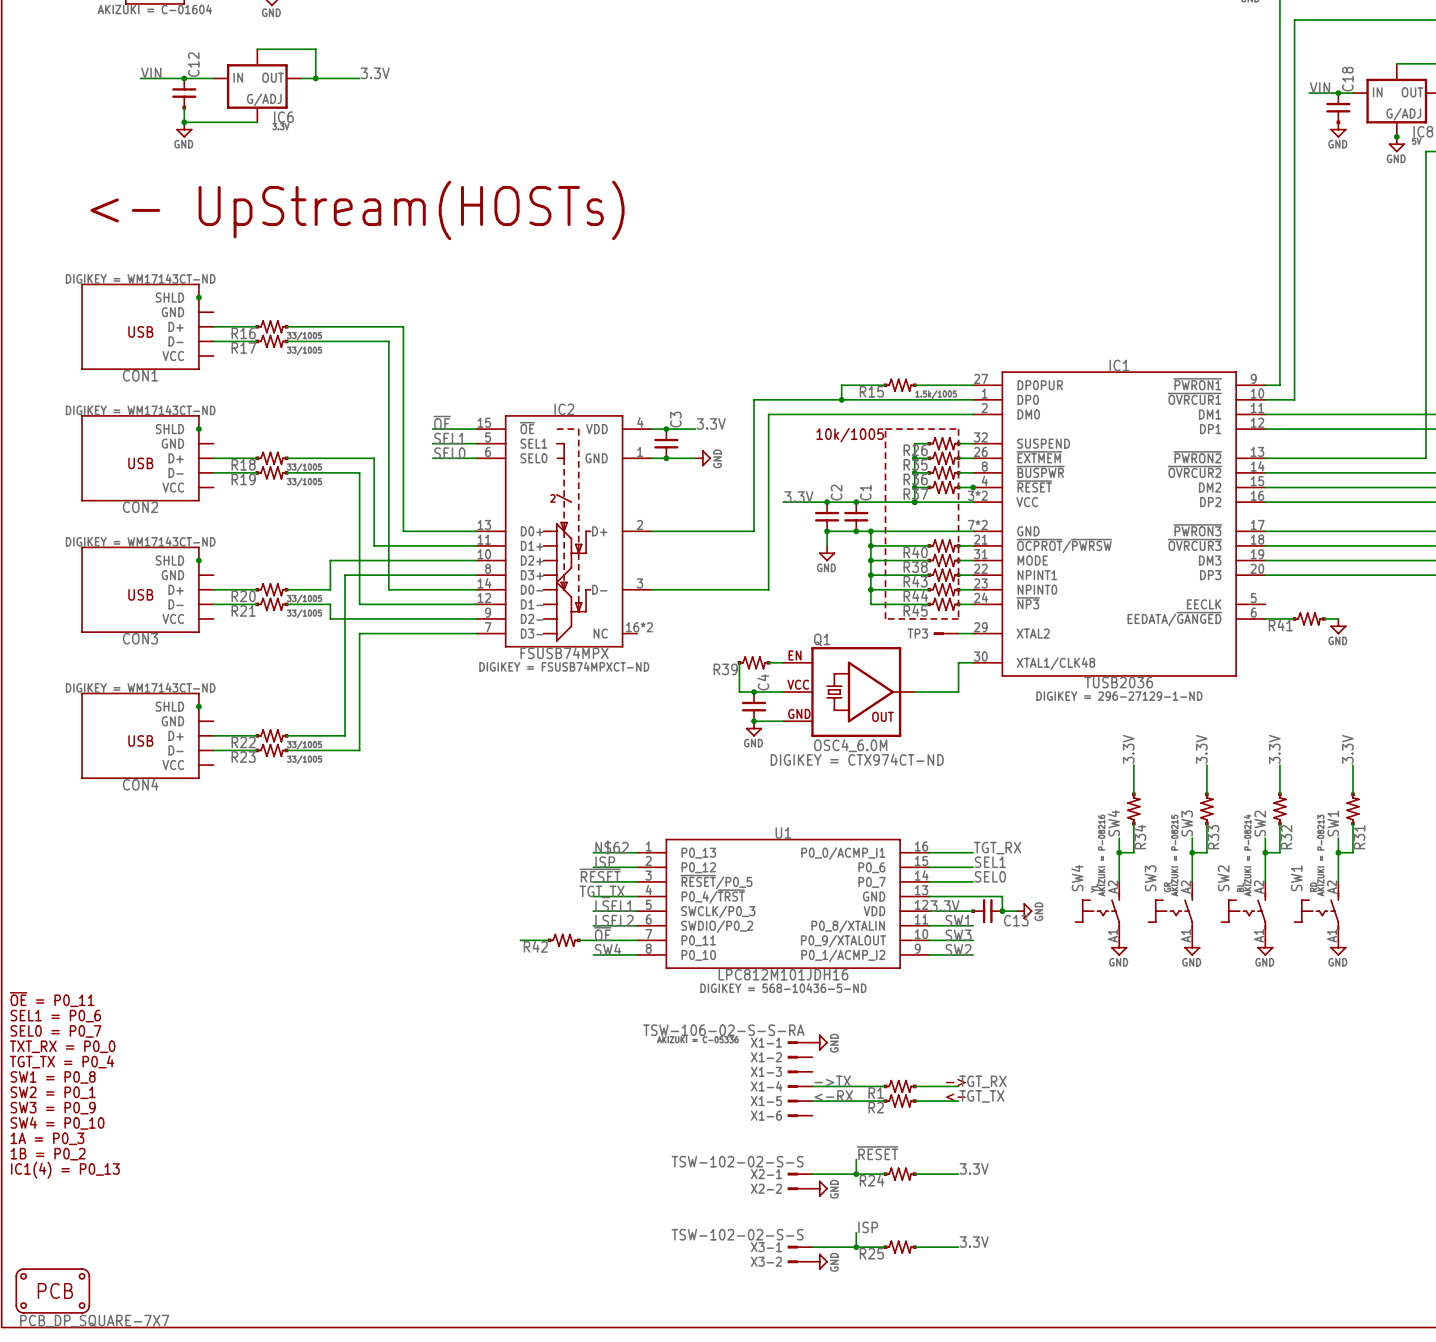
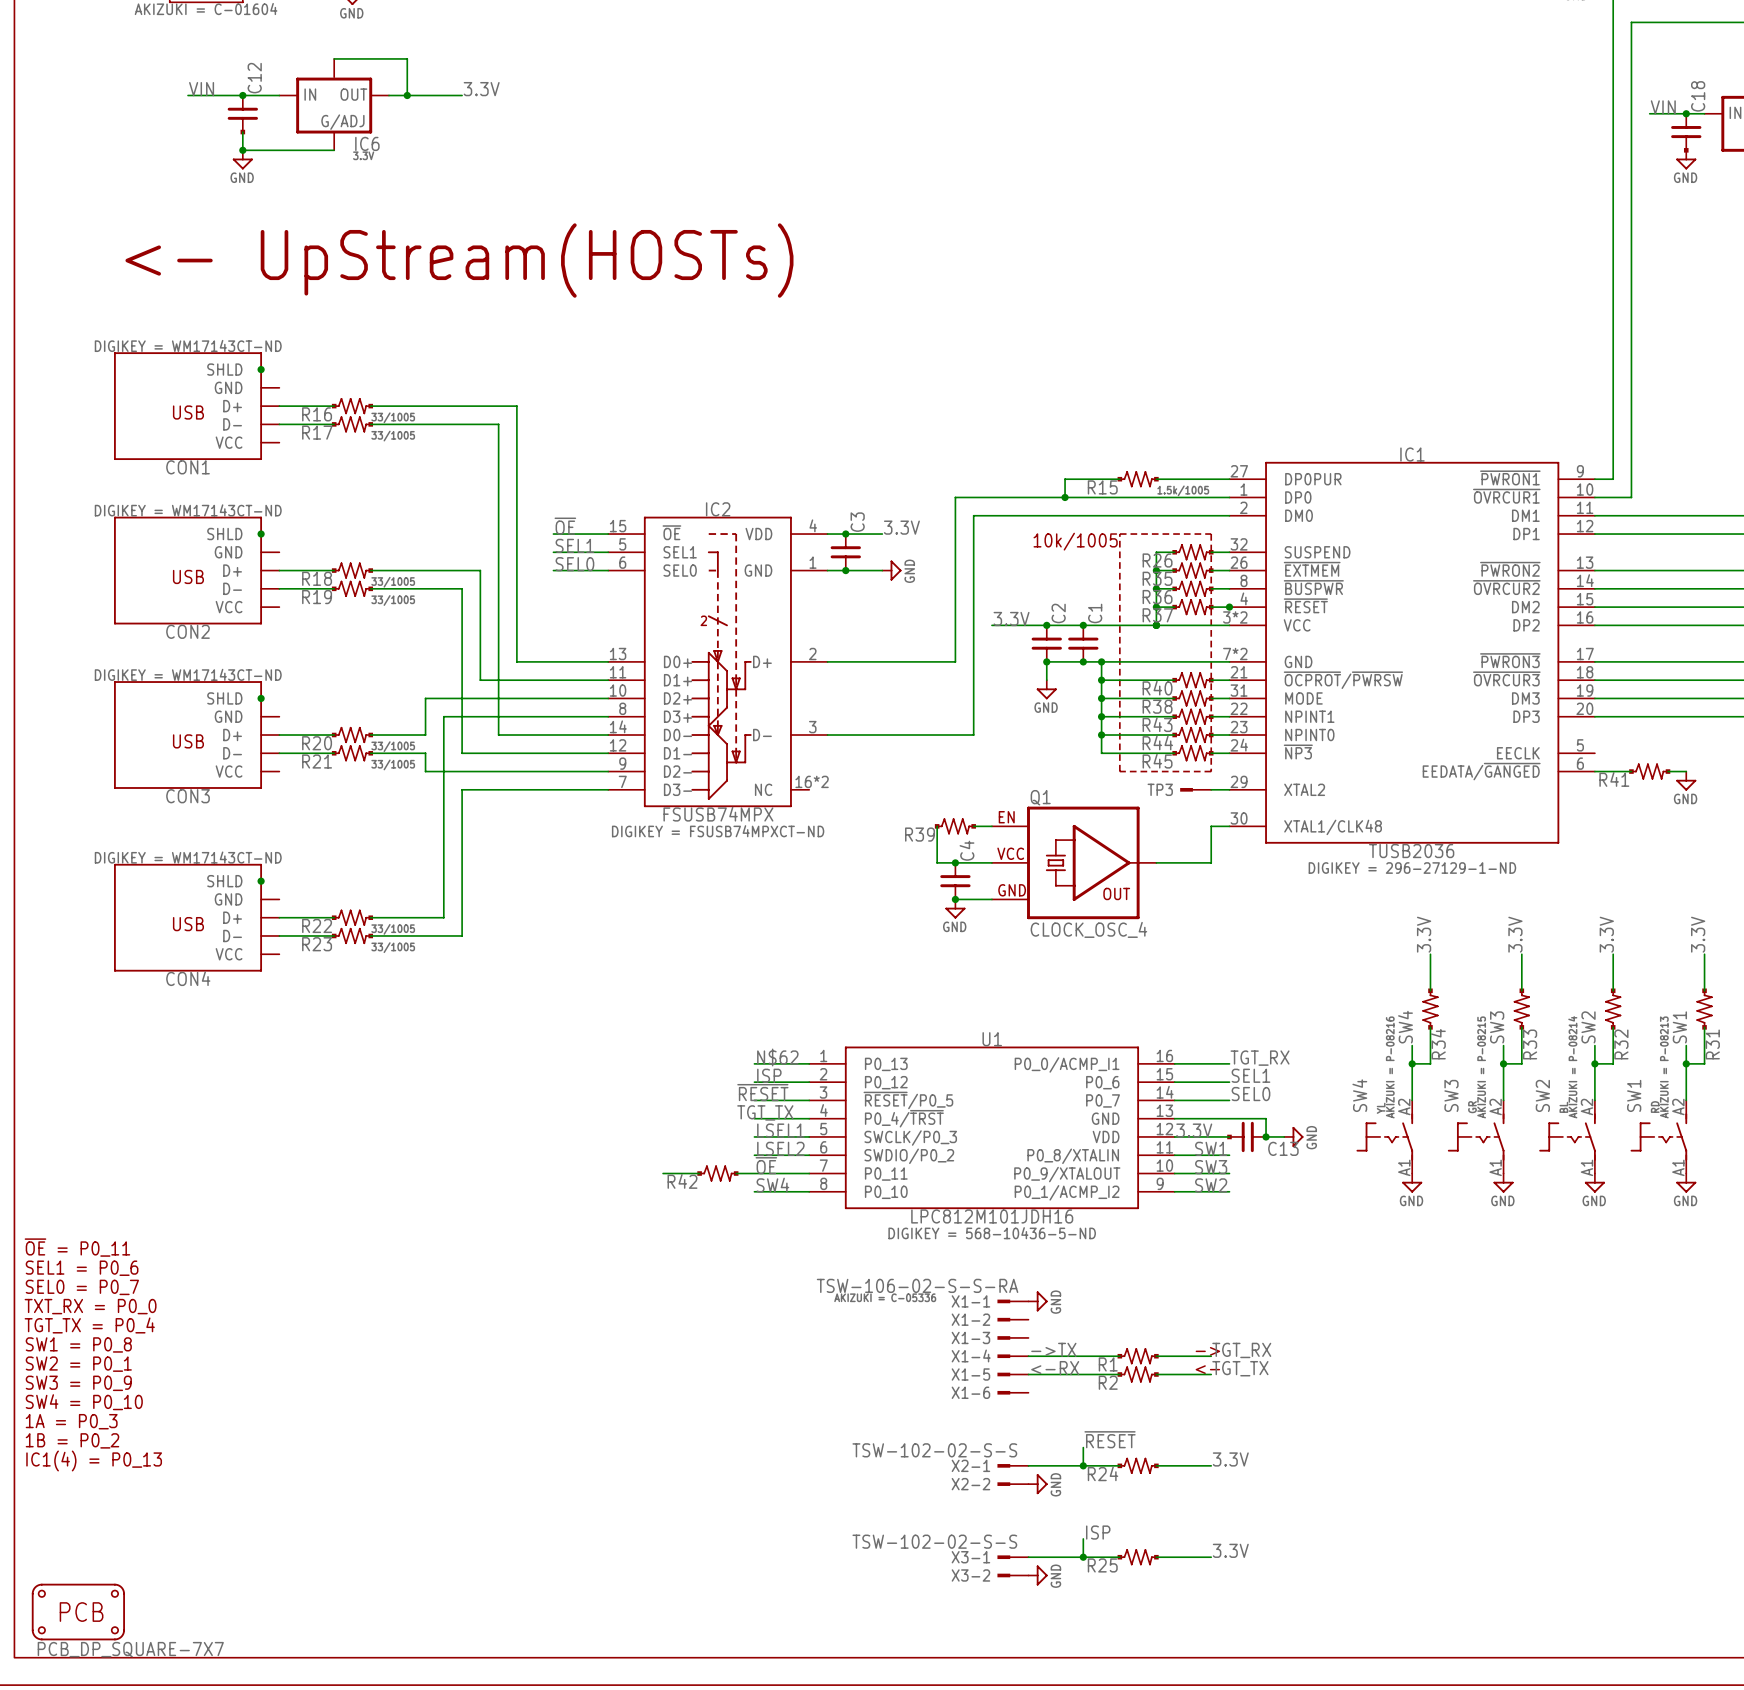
Q1 value: OSC4_6.0M (850, 745) -> CLOCK_OSC_4 (1088, 929)
Q1 text: DIGIKEY = CTX974CT-ND (857, 759) -> none

